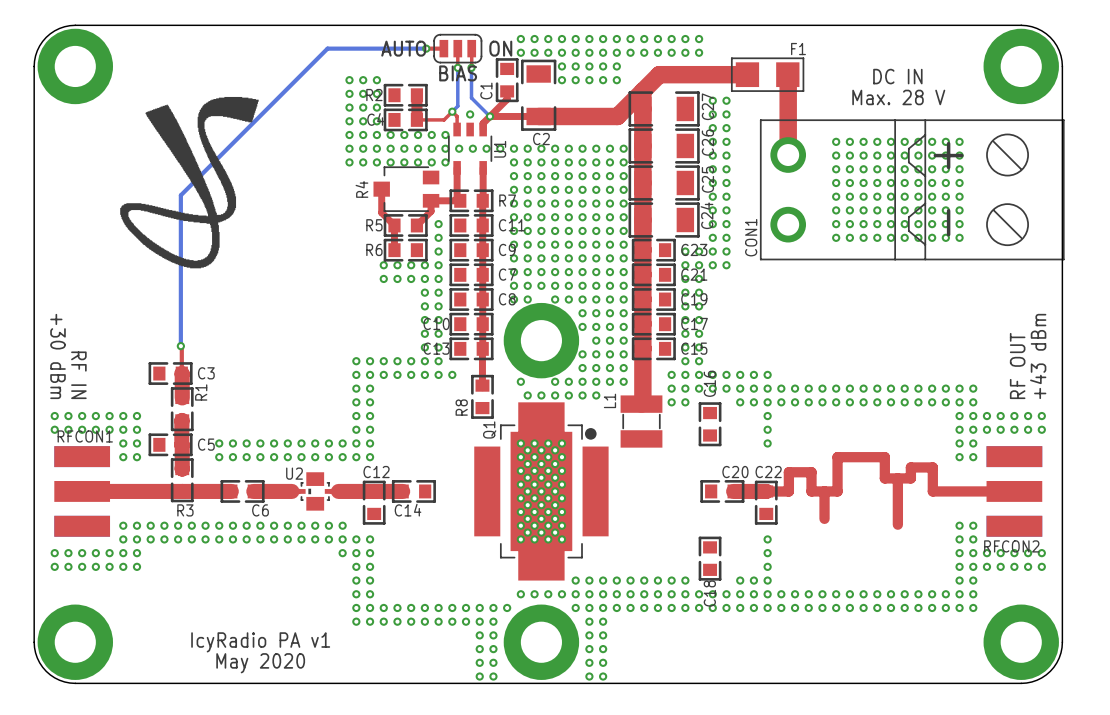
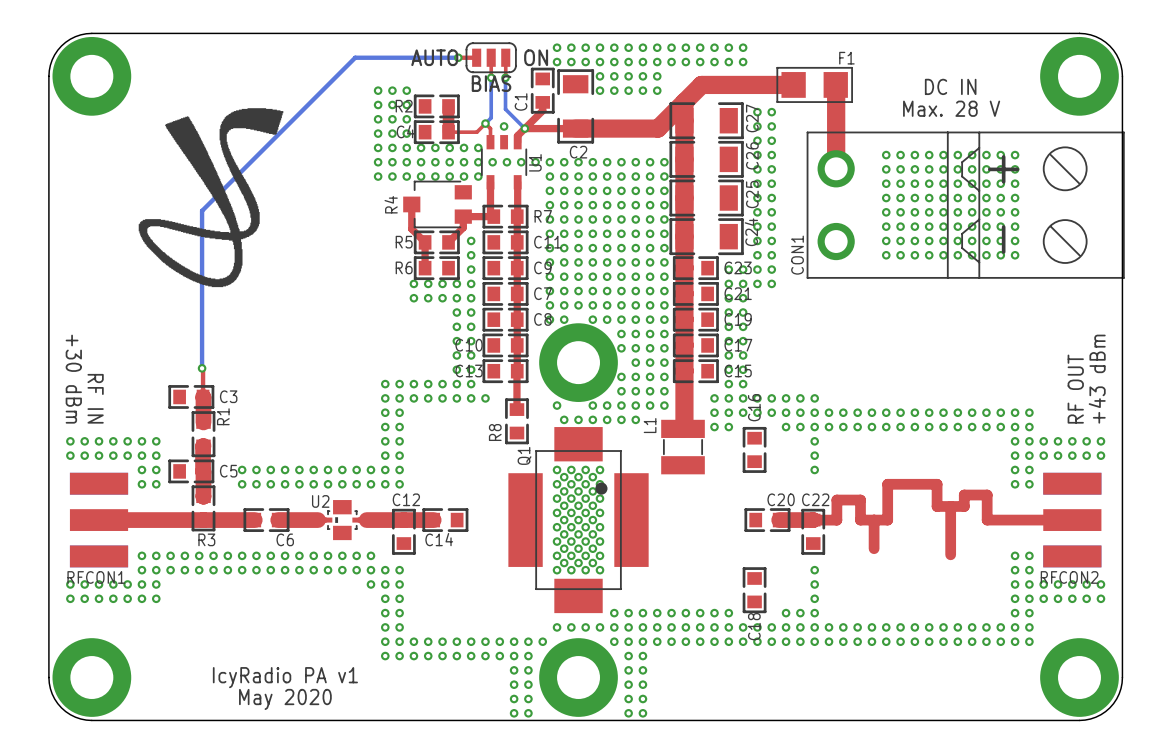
Q1 footprint: [474, 402, 609, 581] -> [508, 427, 649, 614]
RFCON1 name position: RFCON1 (85, 436) -> RFCON1 (96, 577)

